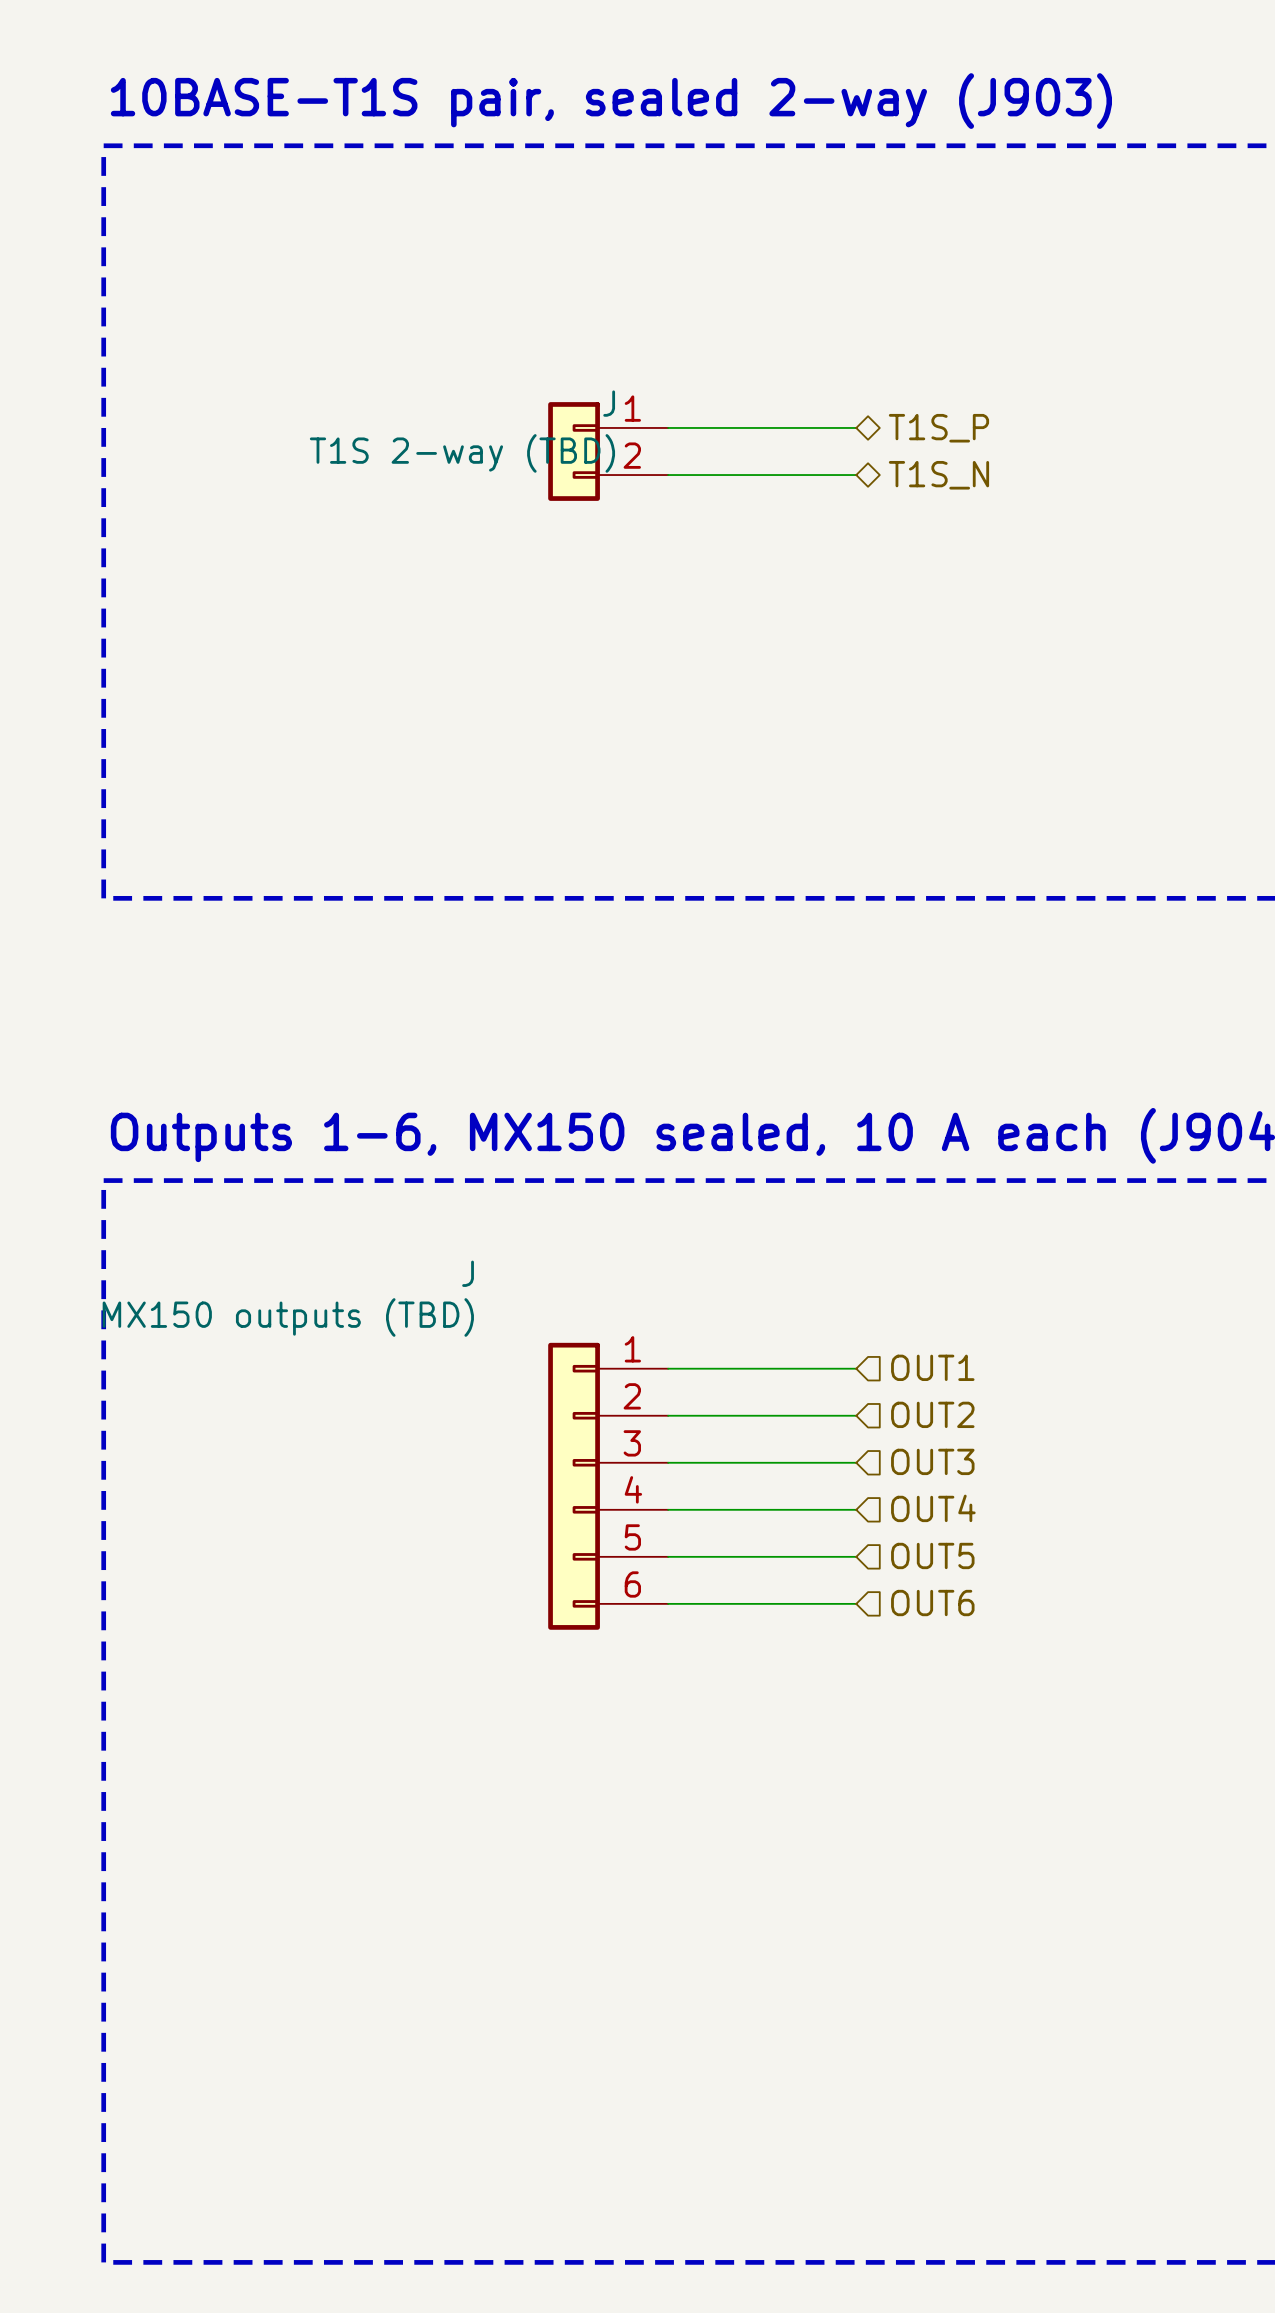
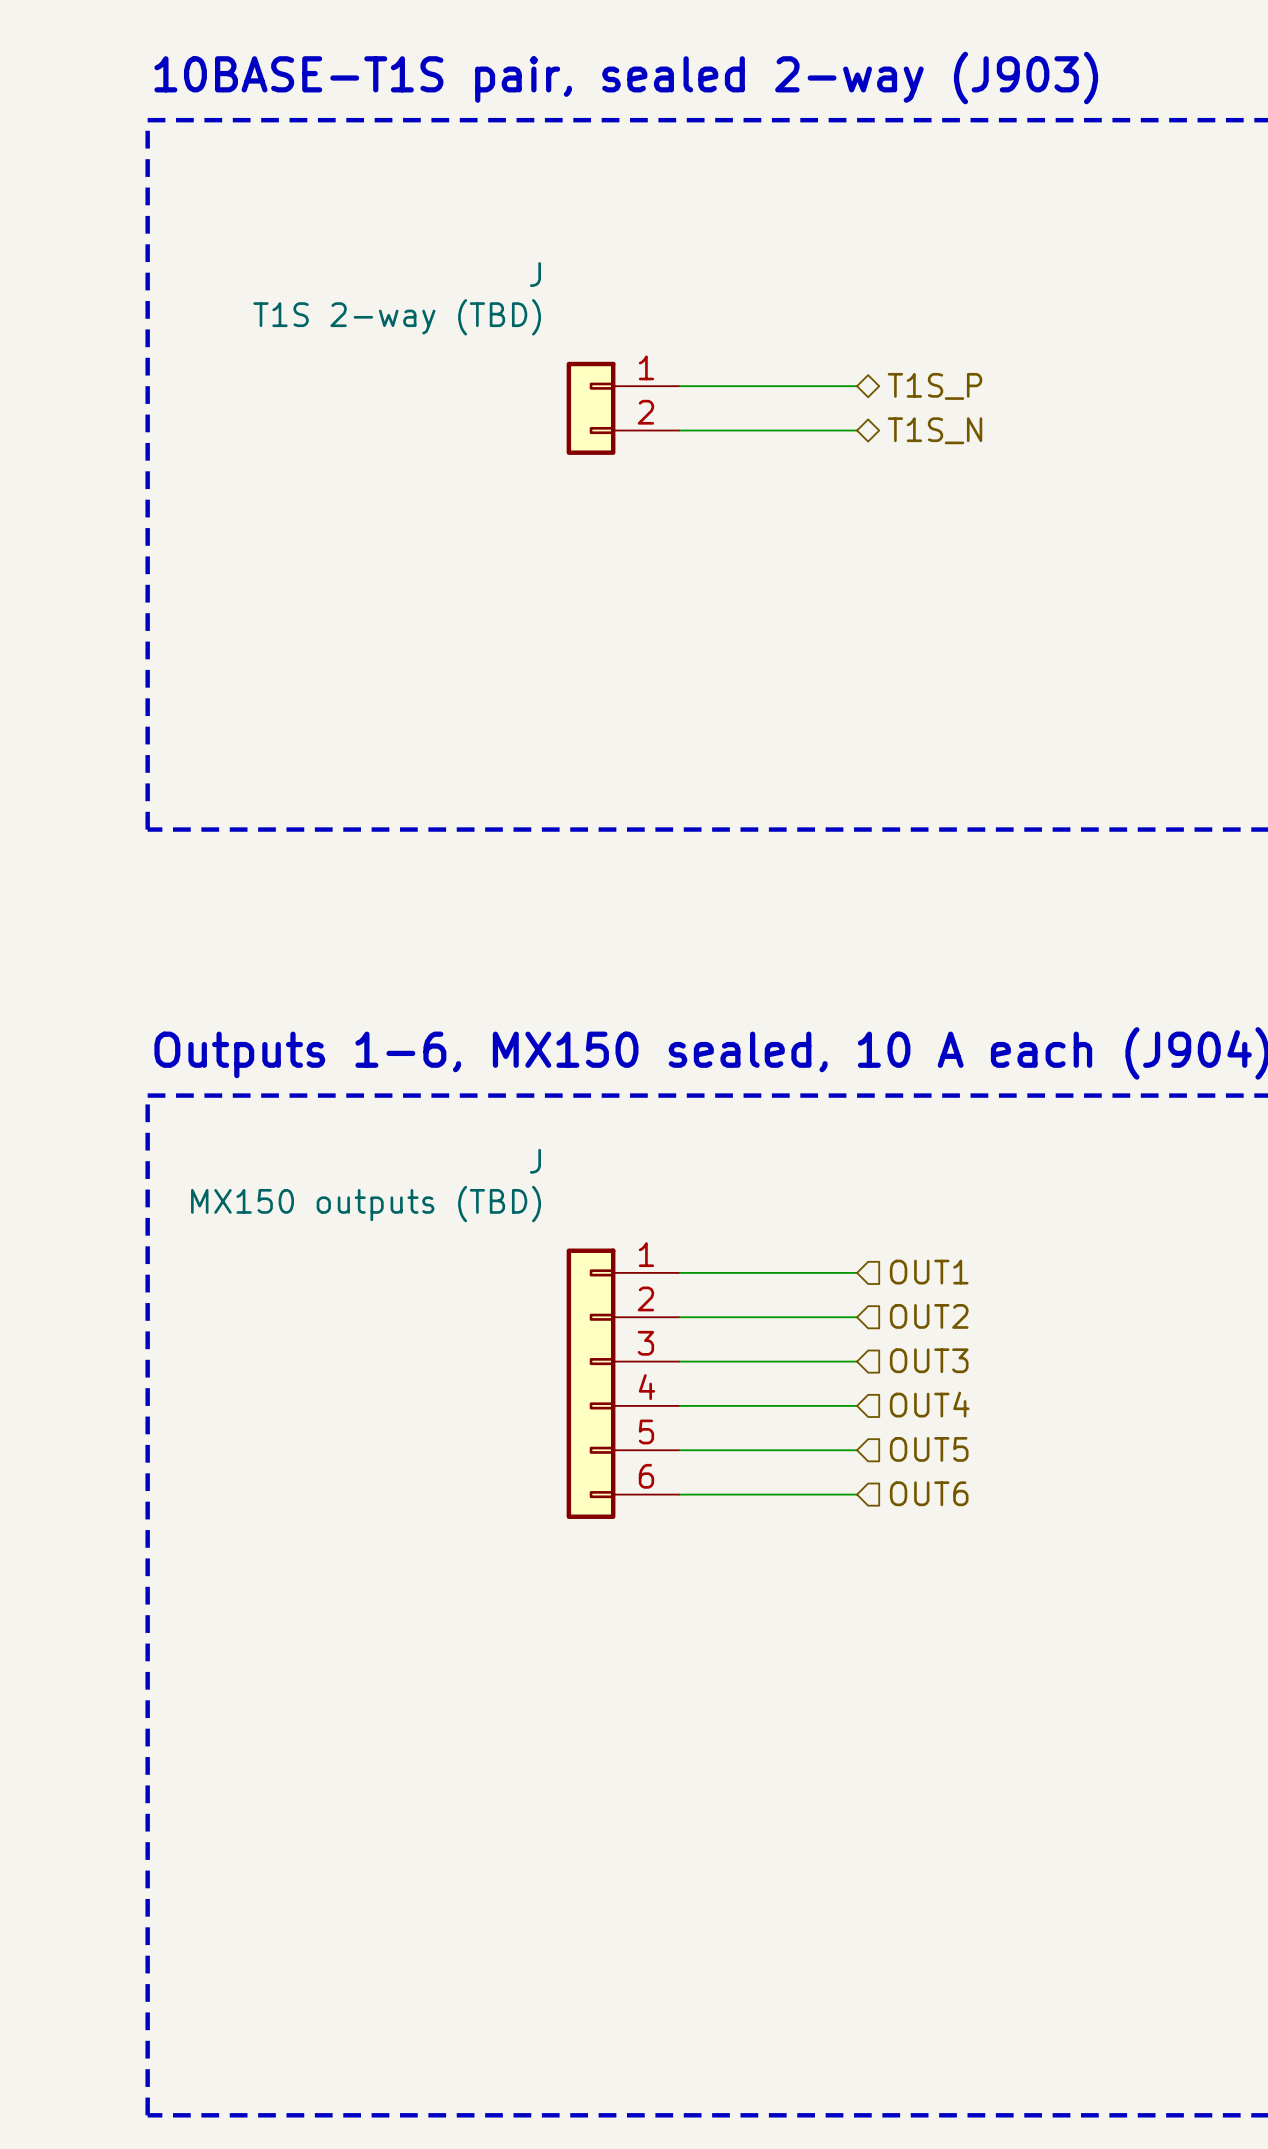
J name position: J (609, 403) -> J (535, 274)
J value position: T1S 2-way (TBD) (462, 453) -> T1S 2-way (TBD) (397, 317)
J name position: J (468, 1273) -> J (535, 1161)
J value position: MX150 outputs (TBD) (288, 1317) -> MX150 outputs (TBD) (366, 1204)

